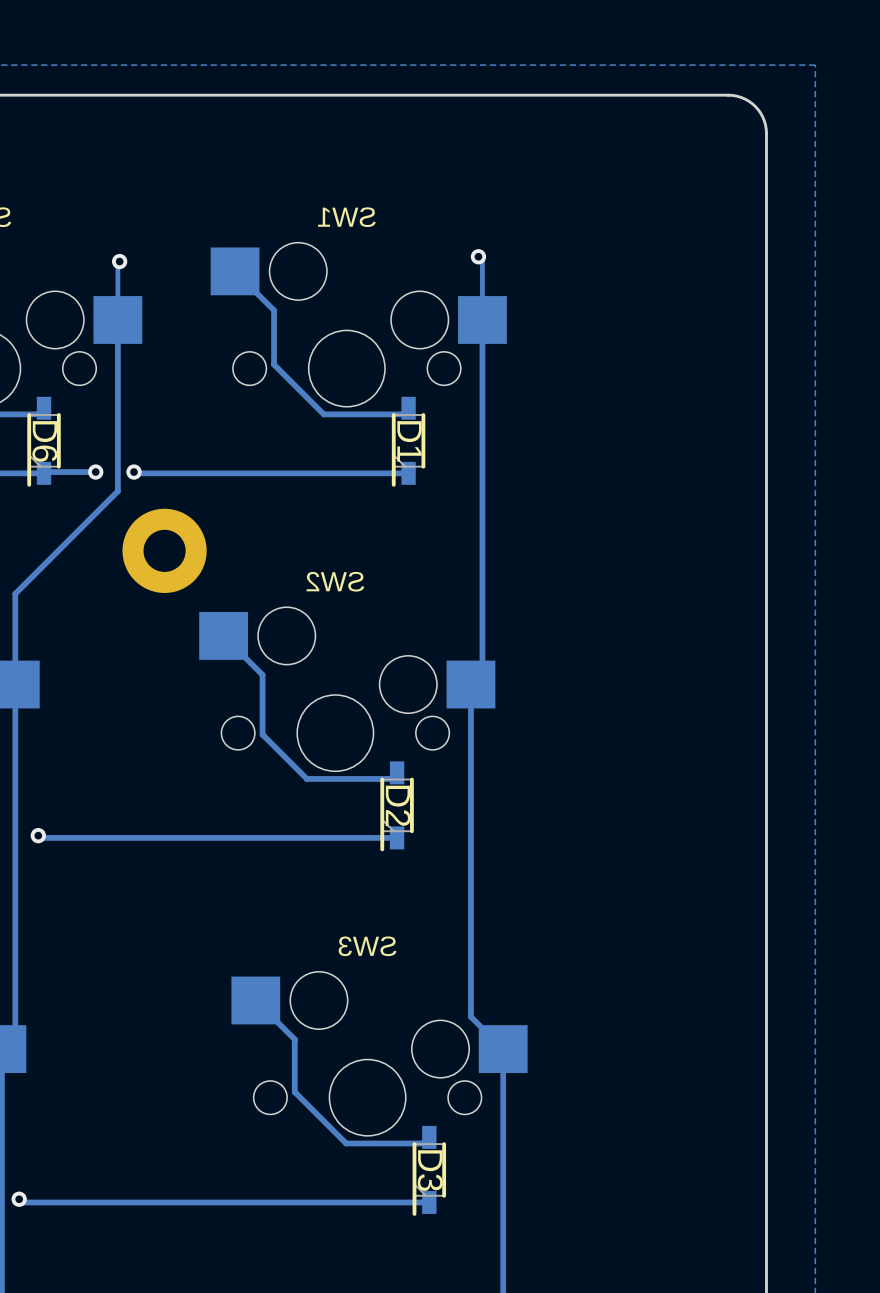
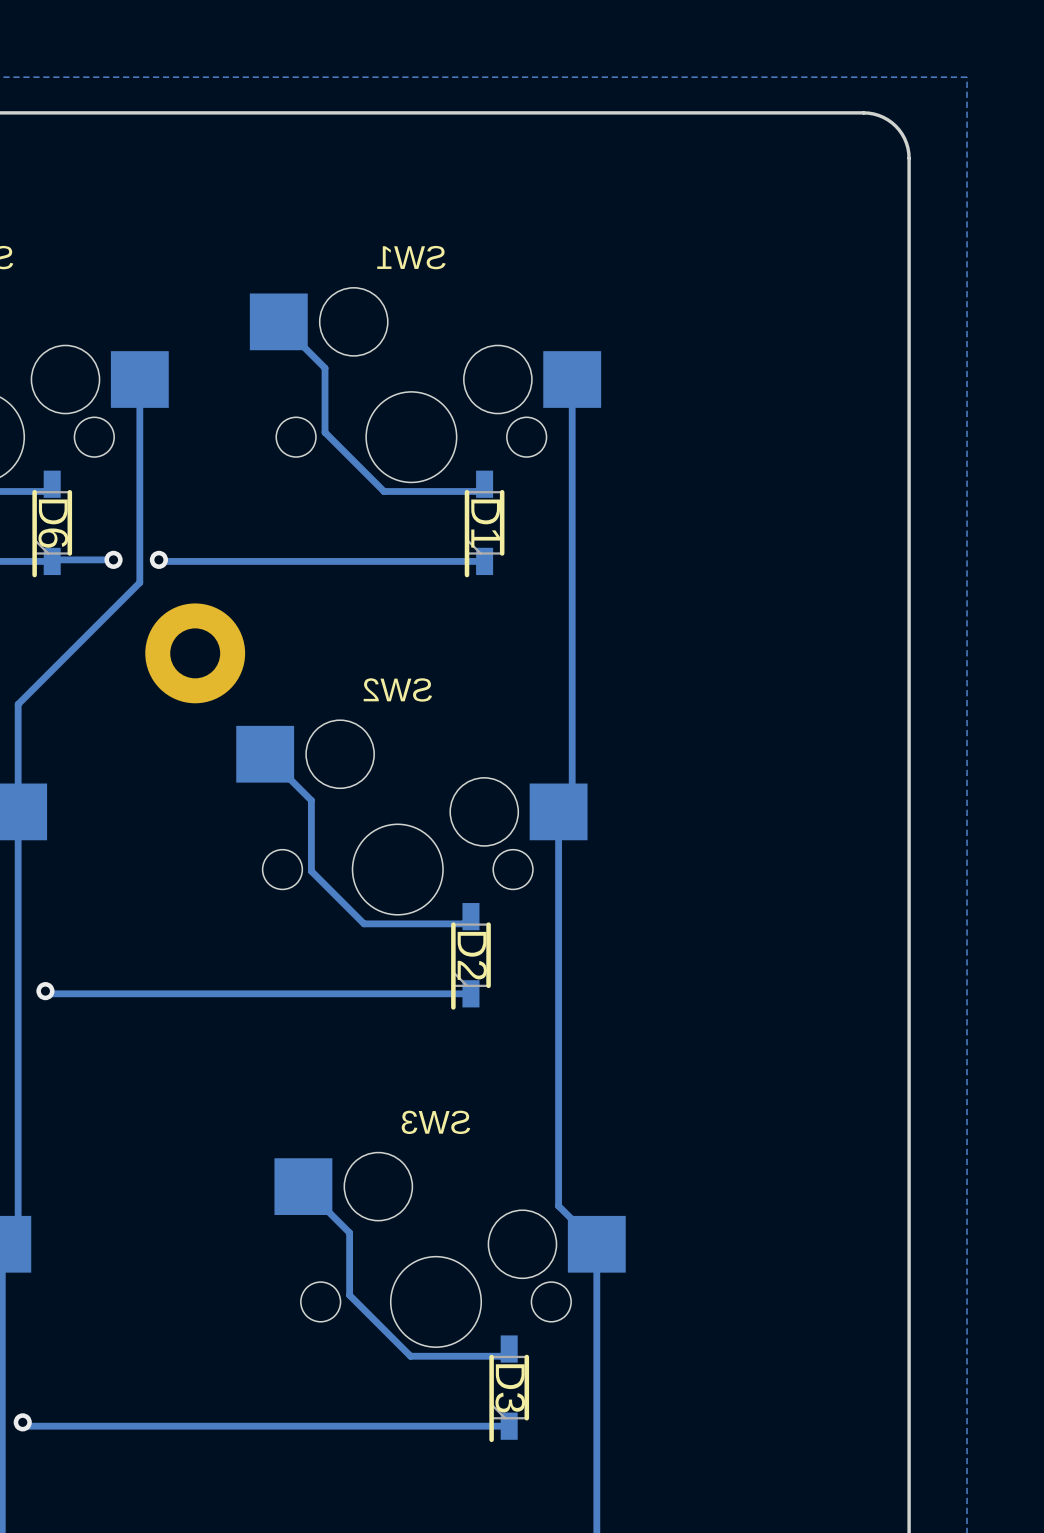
track: (478, 256) (482, 260) (482, 319) -> none
via: (478, 256) -> none
track: (119, 261) (117, 263) (117, 319) -> none
via: (119, 261) -> none

